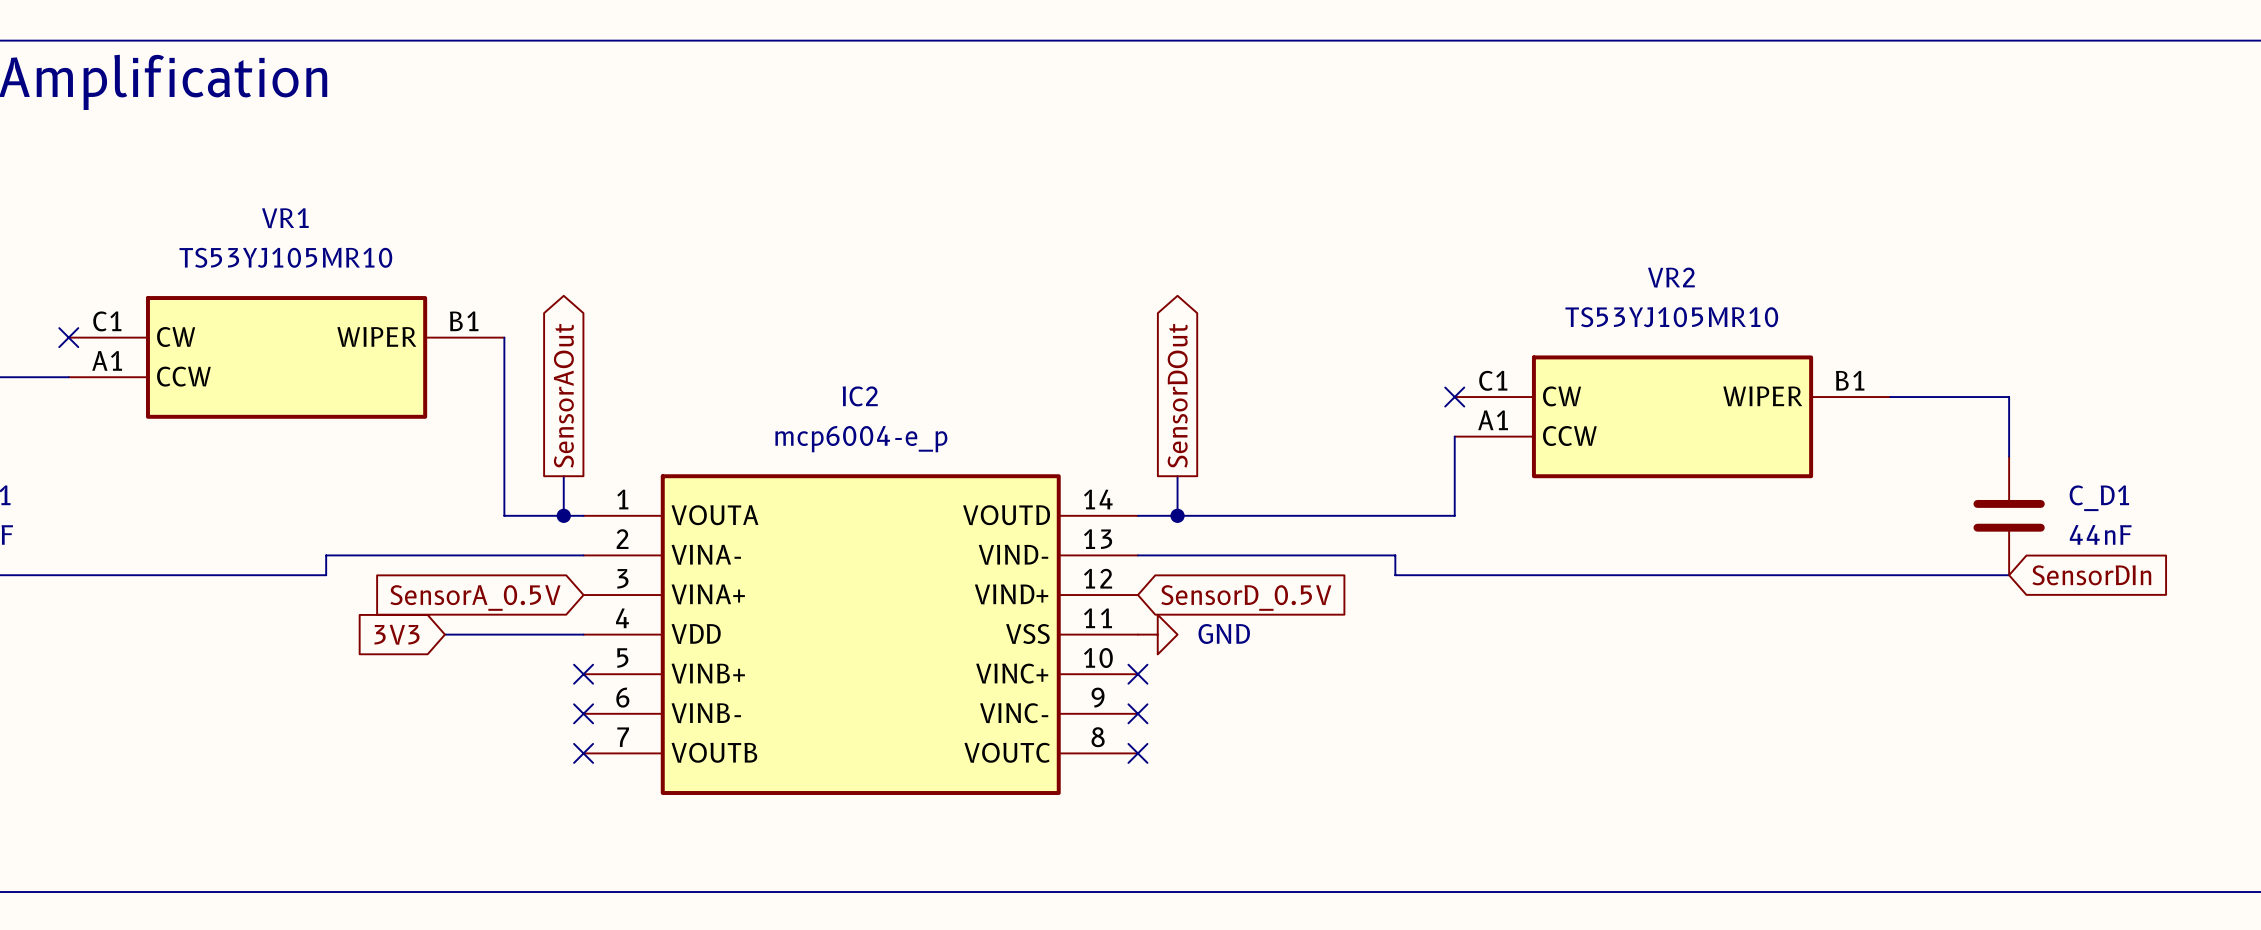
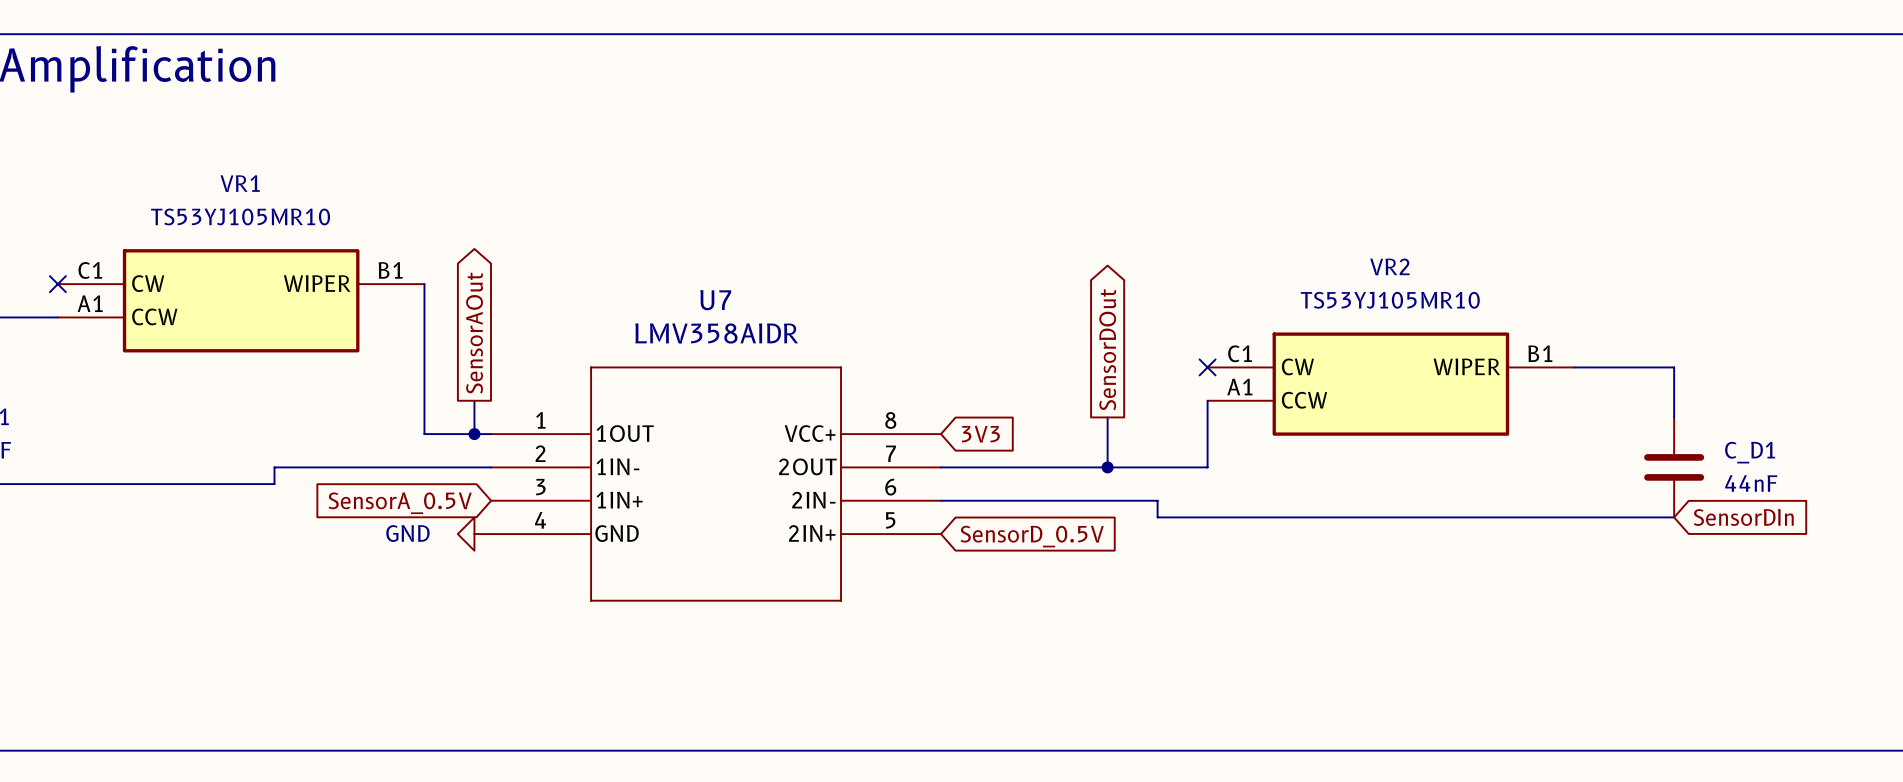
global label position: SensorDOut (1177, 395) -> SensorDOut (1107, 349)
no-connect mark position: (1454, 397) -> (1207, 367)
wire: (1890, 397) (2009, 397) (2009, 456) -> (1574, 367) (1674, 367) (1674, 417)
VR2 position: (1672, 416) -> (1390, 384)
wire: (1454, 436) (1454, 515) (1137, 515) -> none
wire: (1177, 476) (1177, 515) -> none
wire: none -> (1107, 417) (1107, 467)
global label: none -> 3V3 (980, 434)
junction: (1177, 515) -> none
C_D1 position: (2009, 515) -> (1674, 467)
junction: none -> (1107, 467)
wire: (1395, 555) (1395, 575) (2009, 575) -> (1174, 467) (1207, 467) (1207, 400)
U7: none -> LMV358AIDR (716, 484)
global label position: SensorDIn (2091, 575) -> SensorDIn (1743, 517)
wire: none -> (940, 500) (1157, 500) (1157, 517) (1674, 517)
global label position: SensorD_0.5V (1246, 597) -> SensorD_0.5V (1032, 536)
global label: 3V3 (397, 634) -> none
wire: (444, 634) (583, 634) -> none
power symbol: none -> GND (474, 534)
IC2: mcp6004-e_p (860, 634) -> none
power symbol: GND (1157, 634) -> none
no-connect mark: (583, 674) -> none
no-connect mark: (1137, 674) -> none
no-connect mark: (583, 713) -> none
no-connect mark: (1137, 713) -> none
no-connect mark: (583, 753) -> none
no-connect mark: (1137, 753) -> none

